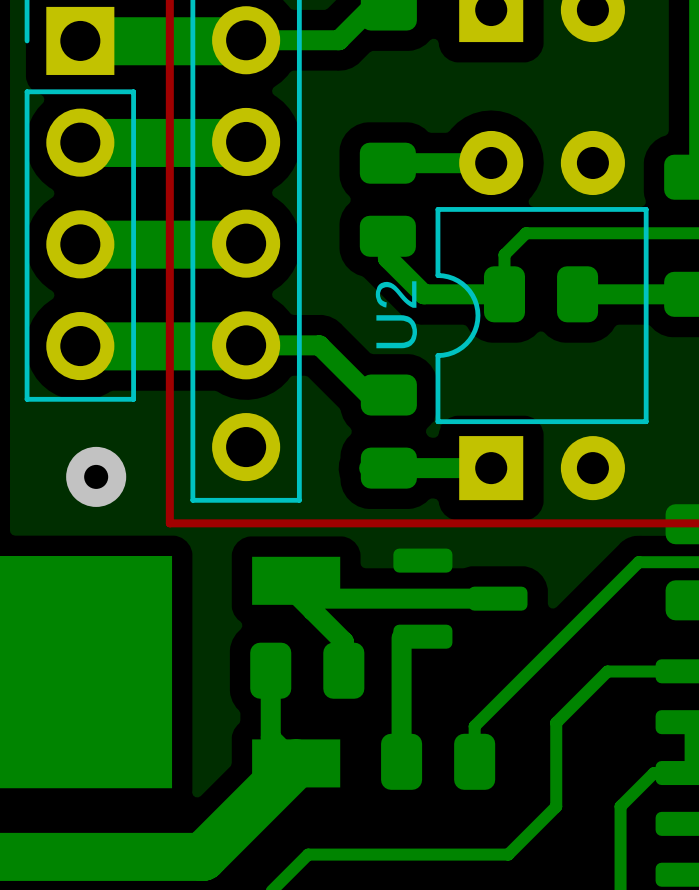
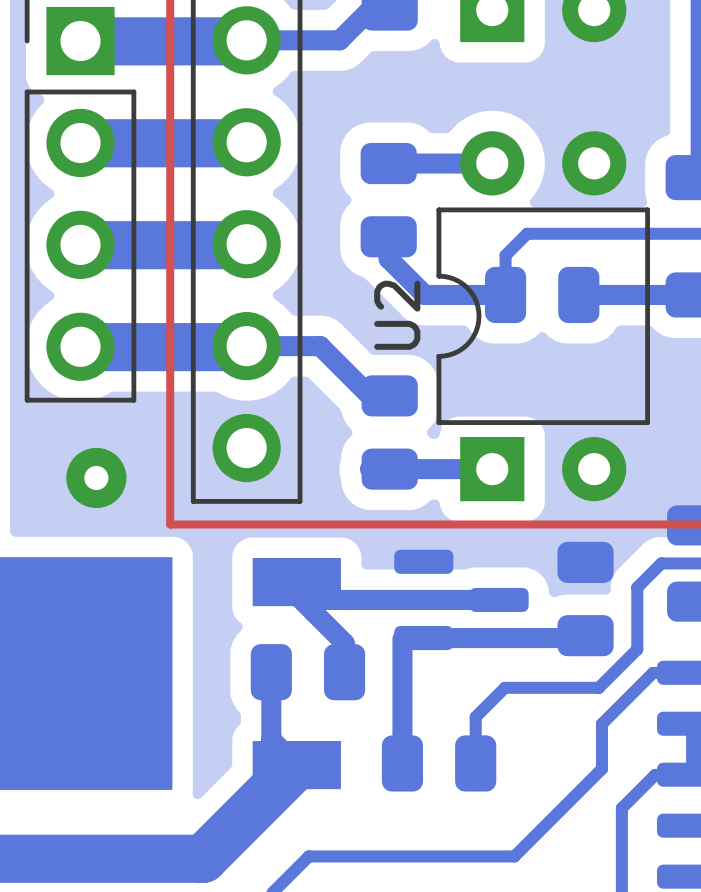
bottom track: (659, 562) (638, 562) (474, 726) -> (661, 563) (637, 587) (637, 649) (598, 687) (504, 687) (475, 717) (475, 727)
part: none -> (585, 599)
bottom track: none -> (585, 635) (583, 638) (423, 638)
bottom track: (651, 671) (607, 671) (556, 722) (556, 806) (508, 854) -> (652, 672) (601, 723) (601, 768) (514, 856) (509, 856)

